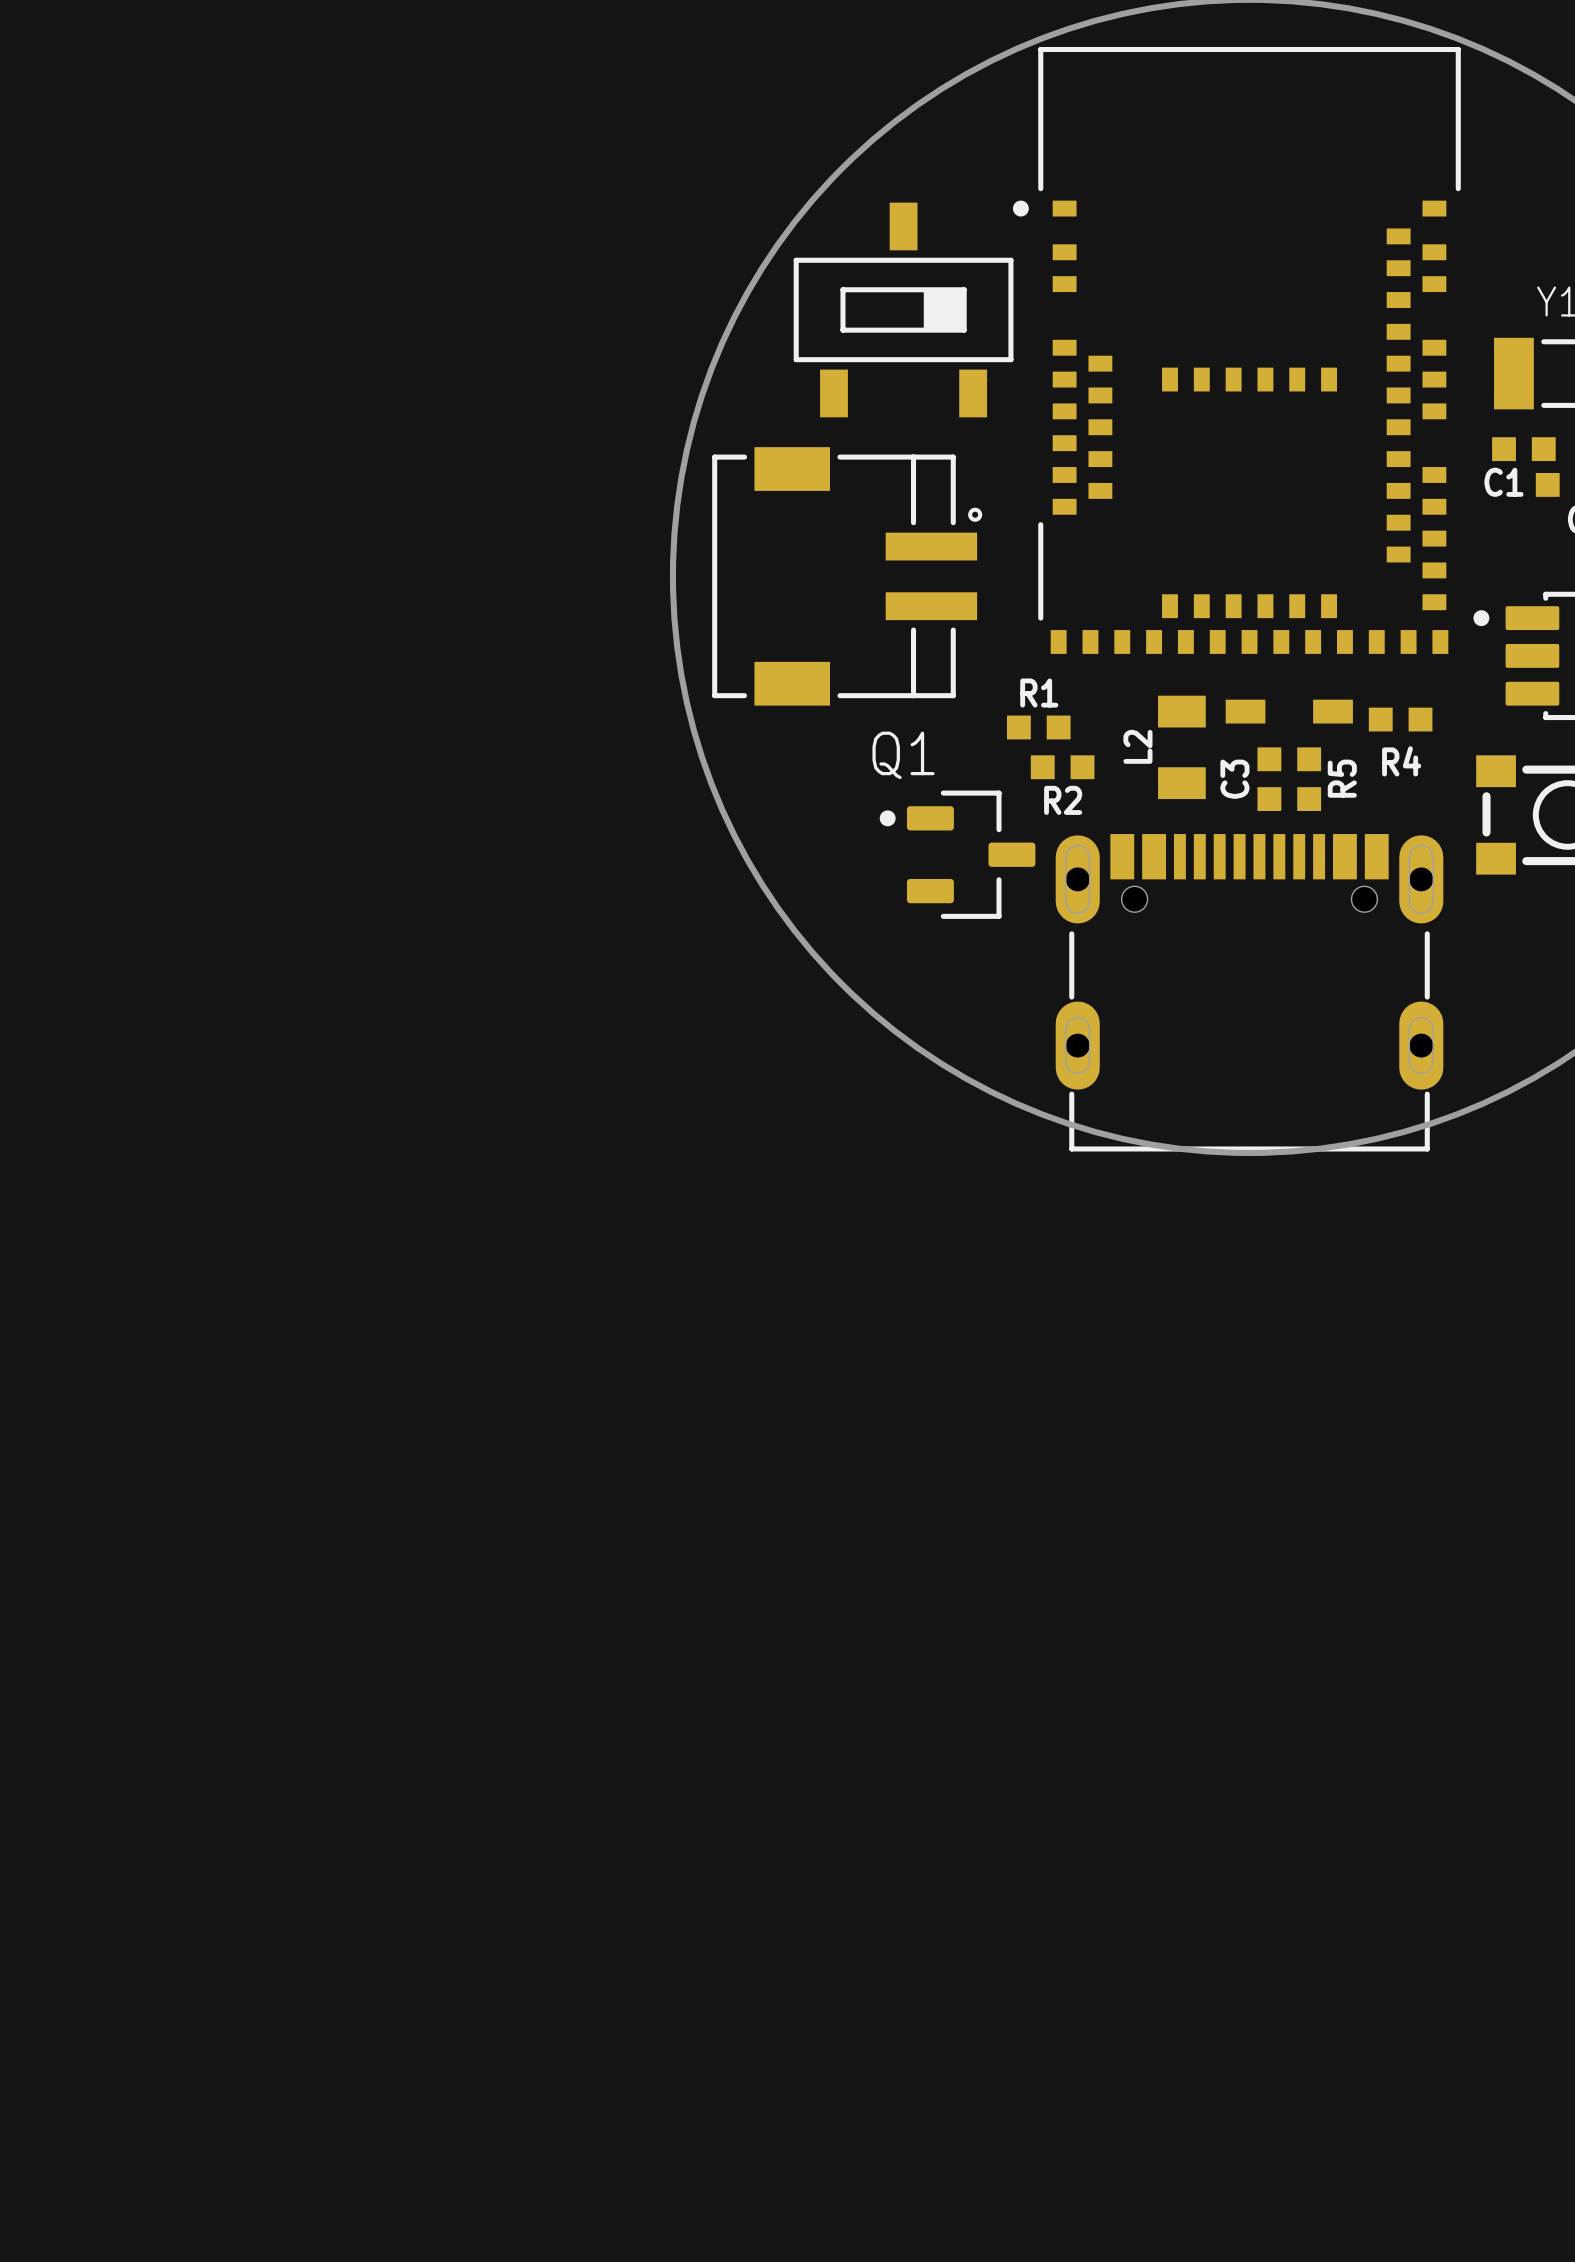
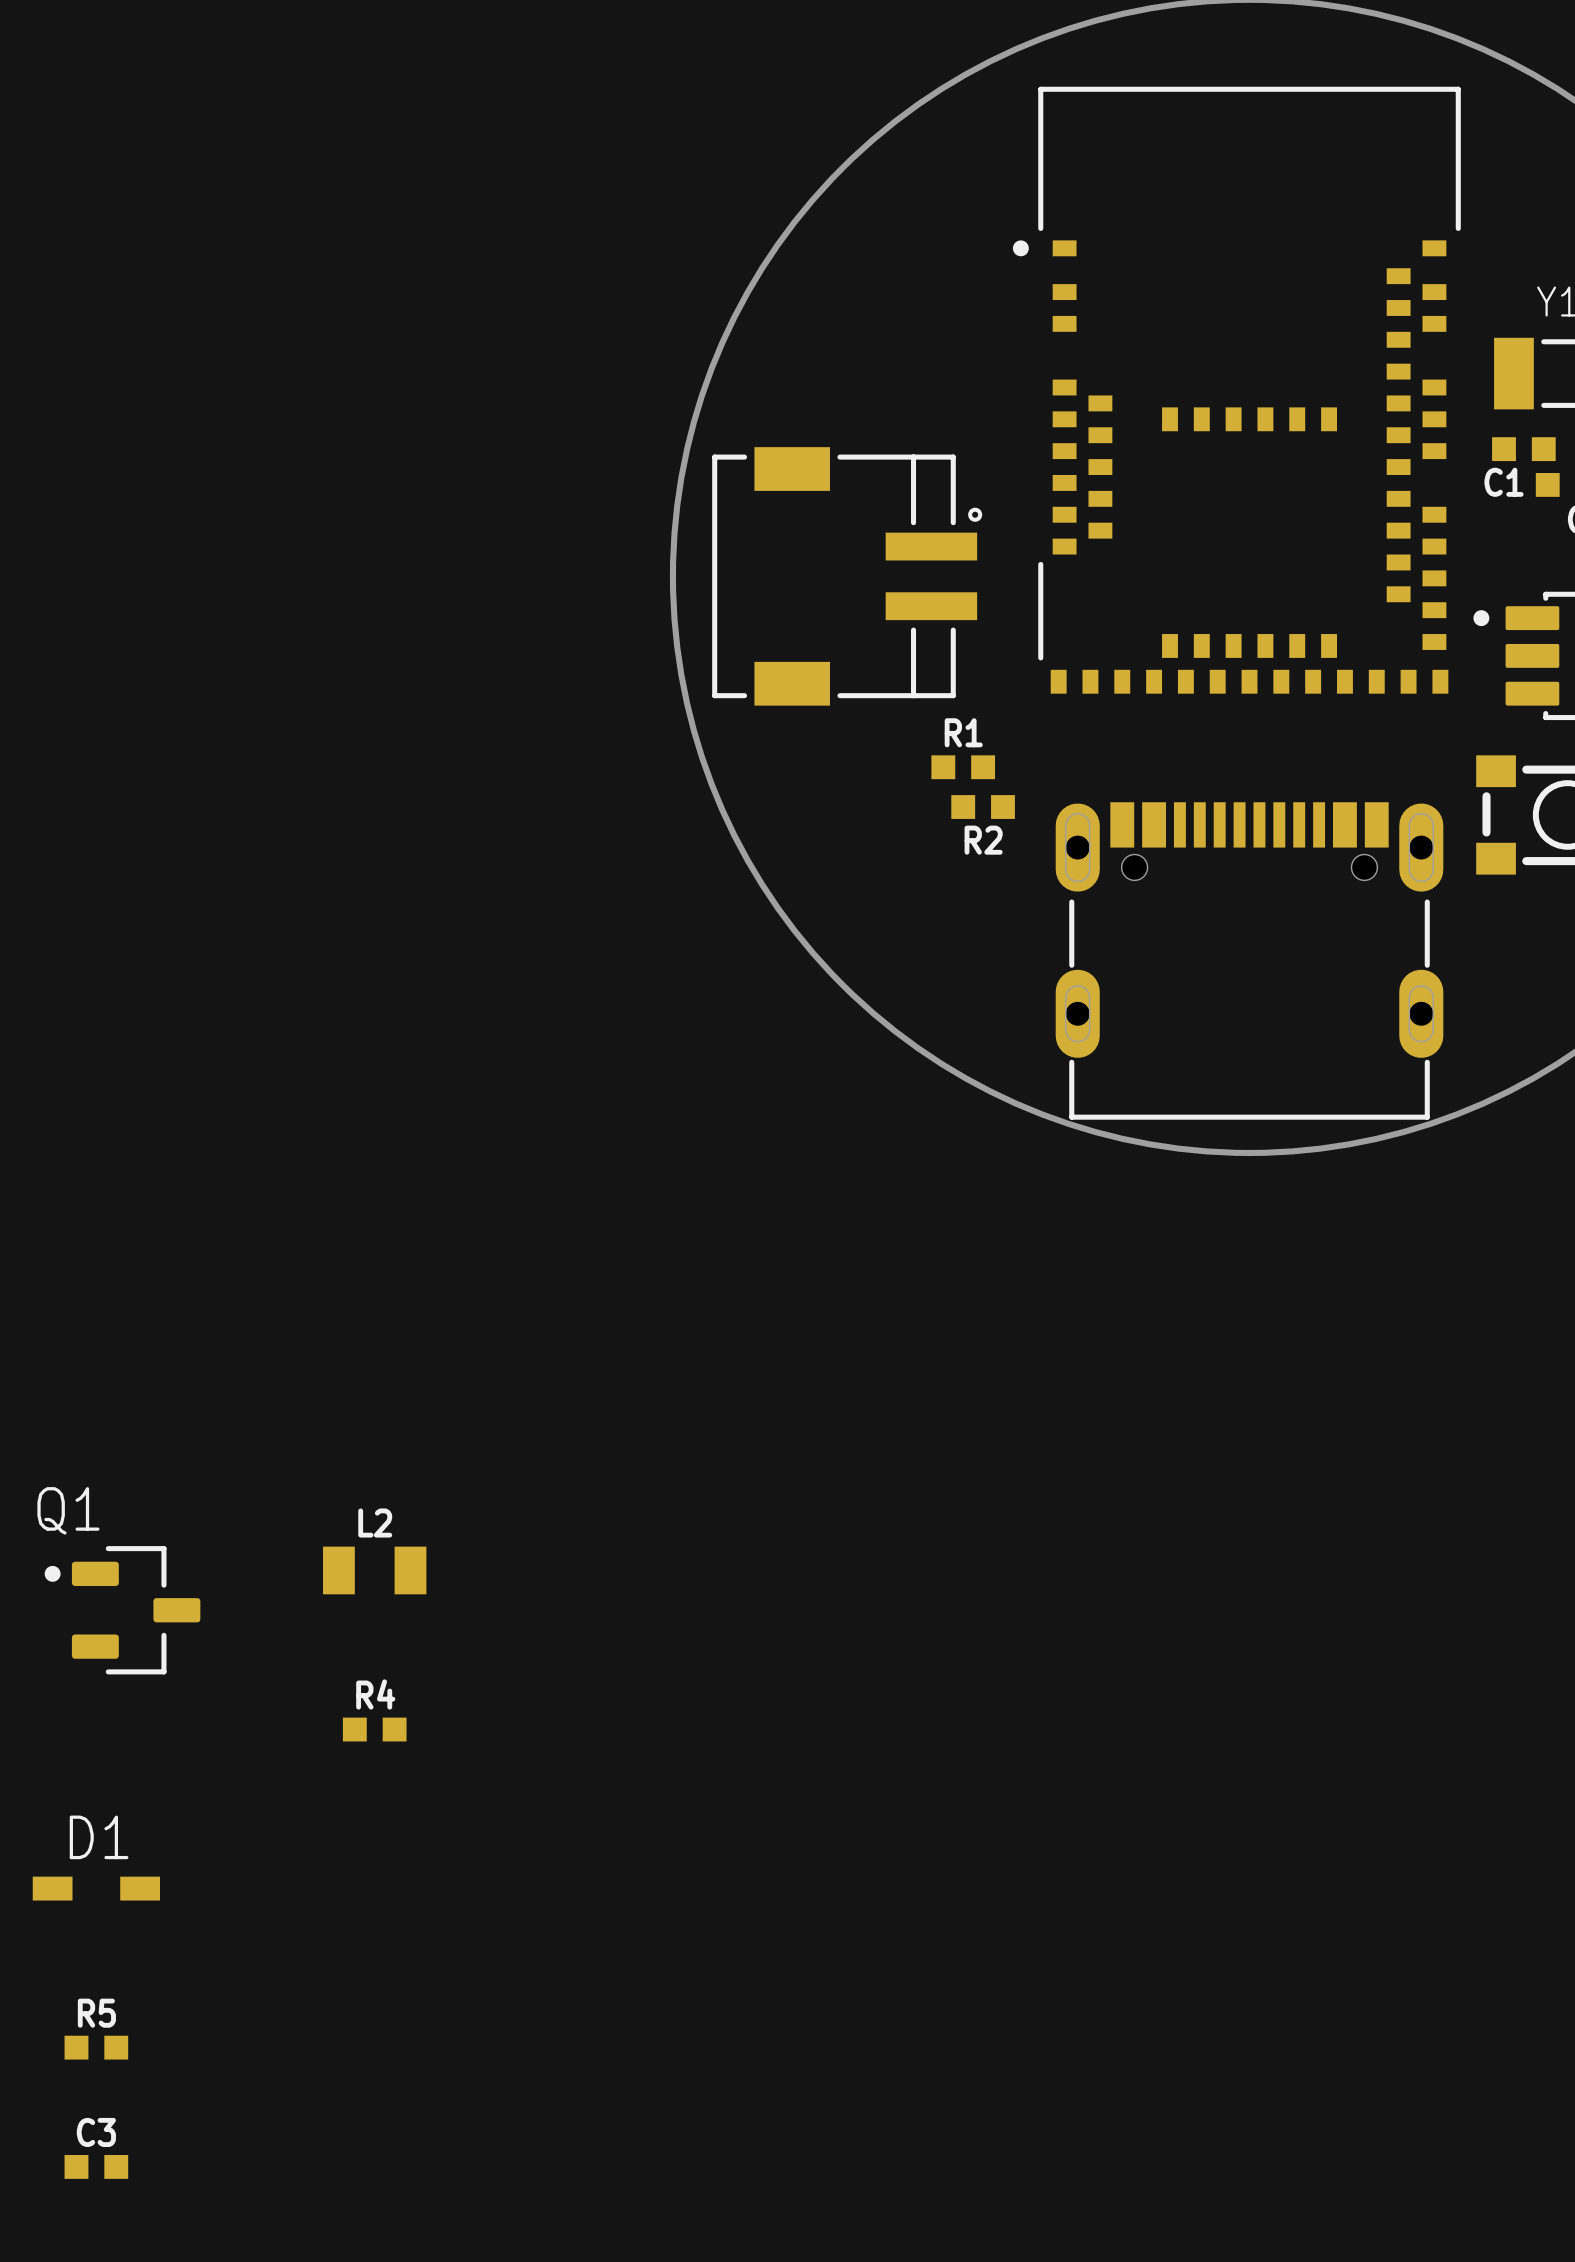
part: (903, 309) -> none
part position: (1236, 350) -> (1236, 390)
part: (1289, 711) -> none
R4 position: (1400, 719) -> (374, 1729)
R1 position: (1038, 727) -> (963, 767)
L2 rotation: 0° (1181, 747) -> 90° clockwise (374, 1570)
L2 position: (1181, 747) -> (374, 1570)
R4 name position: R4 (1401, 761) -> R4 (375, 1694)
R2 position: (1062, 767) -> (983, 807)
C3 rotation: 0° (1269, 779) -> 90° clockwise (96, 2166)
C3 position: (1269, 779) -> (96, 2166)
R5 rotation: 0° (1309, 779) -> 90° clockwise (96, 2047)
R5 position: (1309, 779) -> (96, 2047)
Q1 position: (957, 854) -> (122, 1610)
part position: (1249, 992) -> (1249, 960)
D1: none -> (96, 1888)

